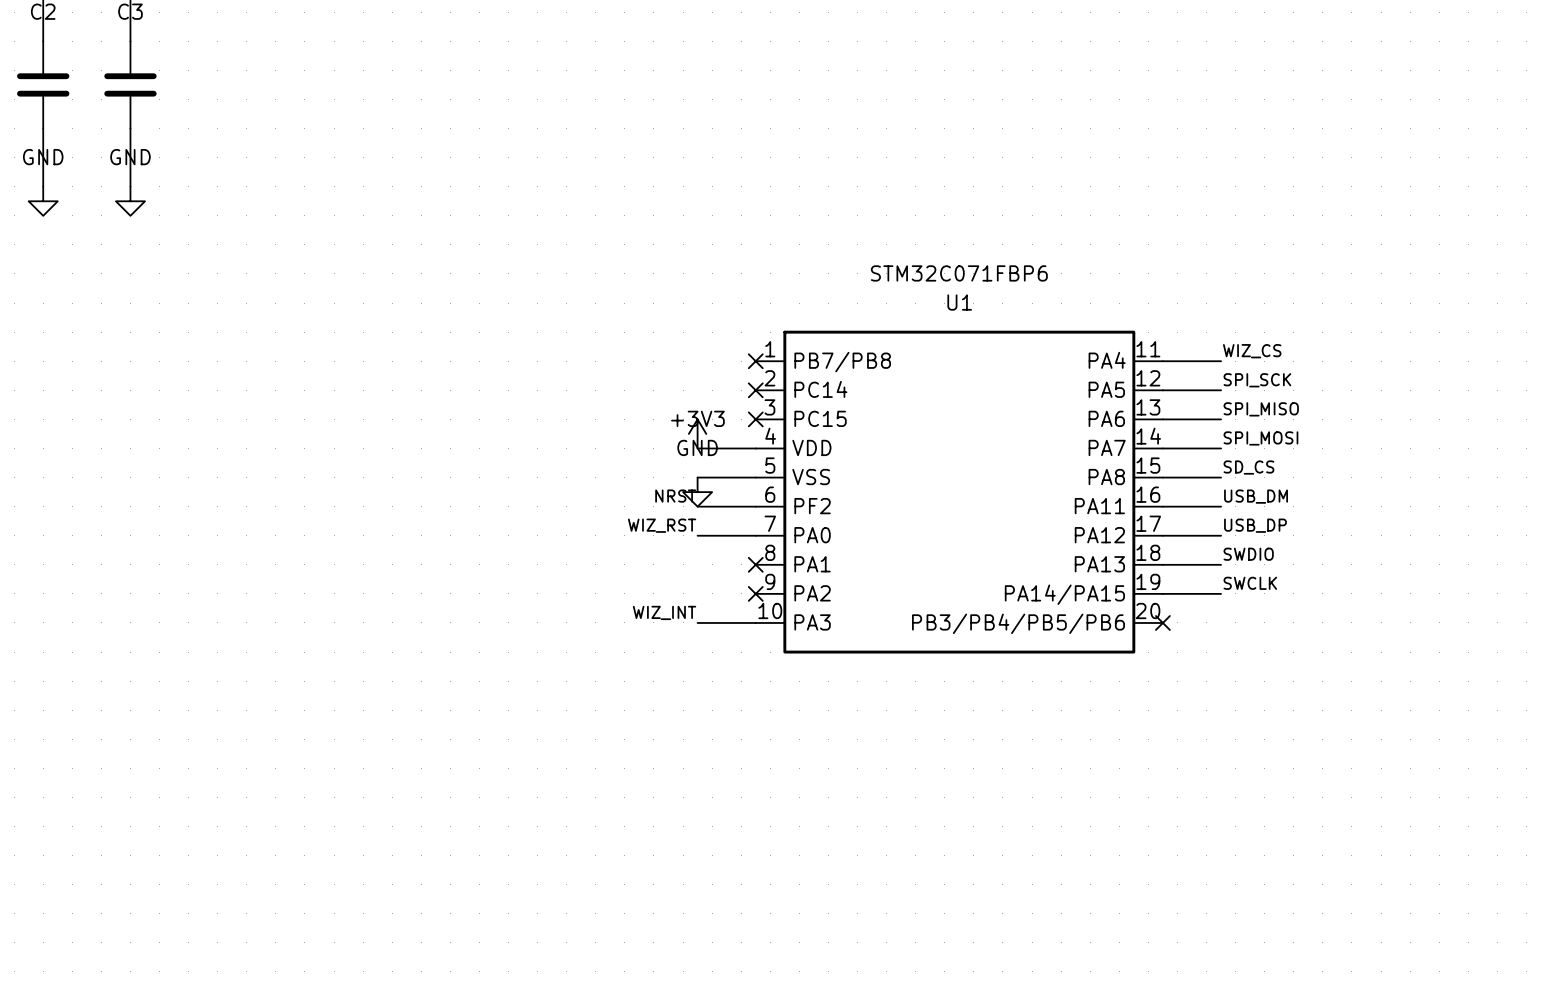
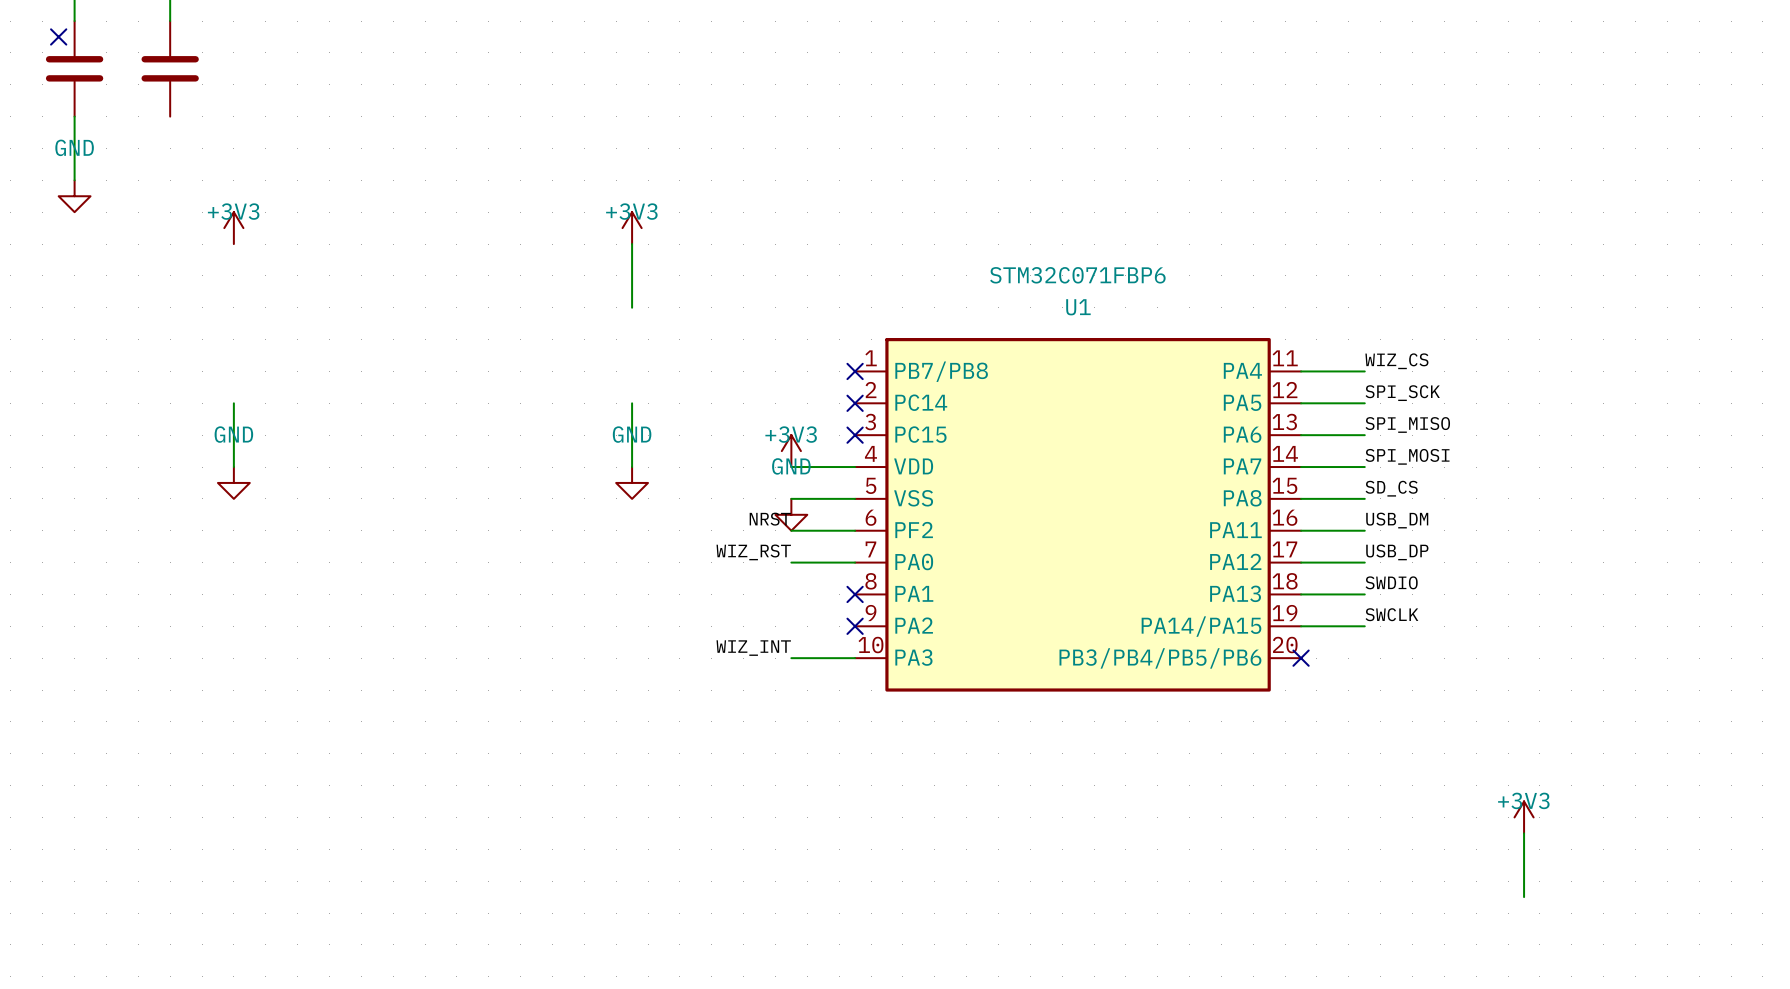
no-connect mark: none -> (58, 36)
wire: (130, 128) (130, 186) -> (233, 403) (233, 467)
power symbol: GND (130, 201) -> none
power symbol: none -> +3V3 (233, 228)
power symbol: none -> +3V3 (632, 228)
wire: none -> (632, 244) (632, 307)
wire: none -> (632, 403) (632, 467)
power symbol: none -> GND (233, 482)
power symbol: none -> GND (632, 482)
power symbol: none -> +3V3 (1524, 817)
wire: none -> (1524, 833) (1524, 897)

